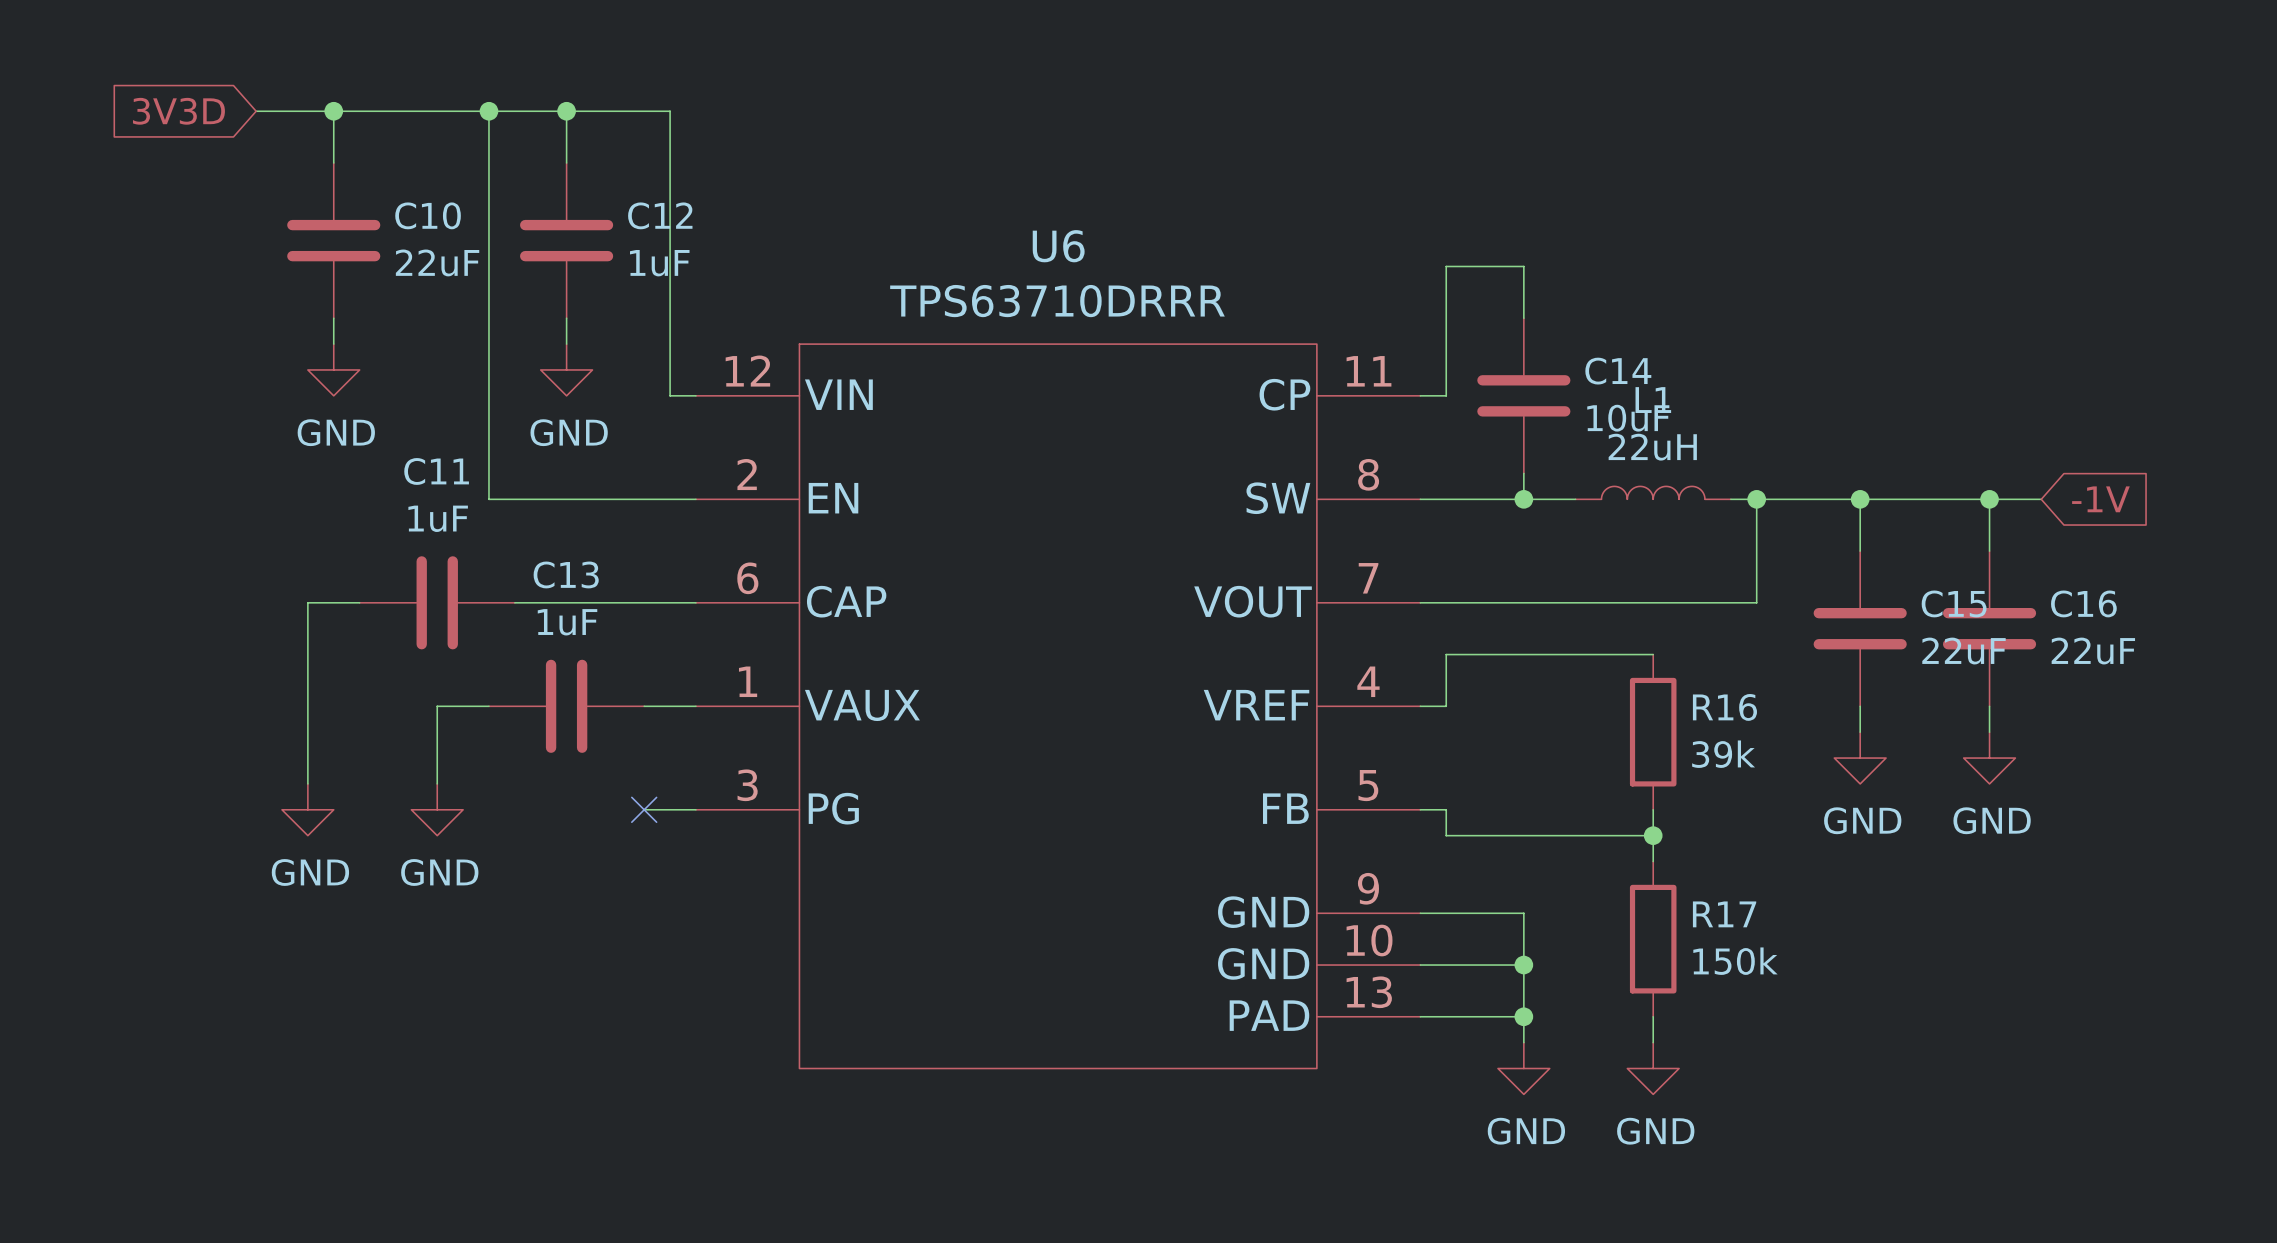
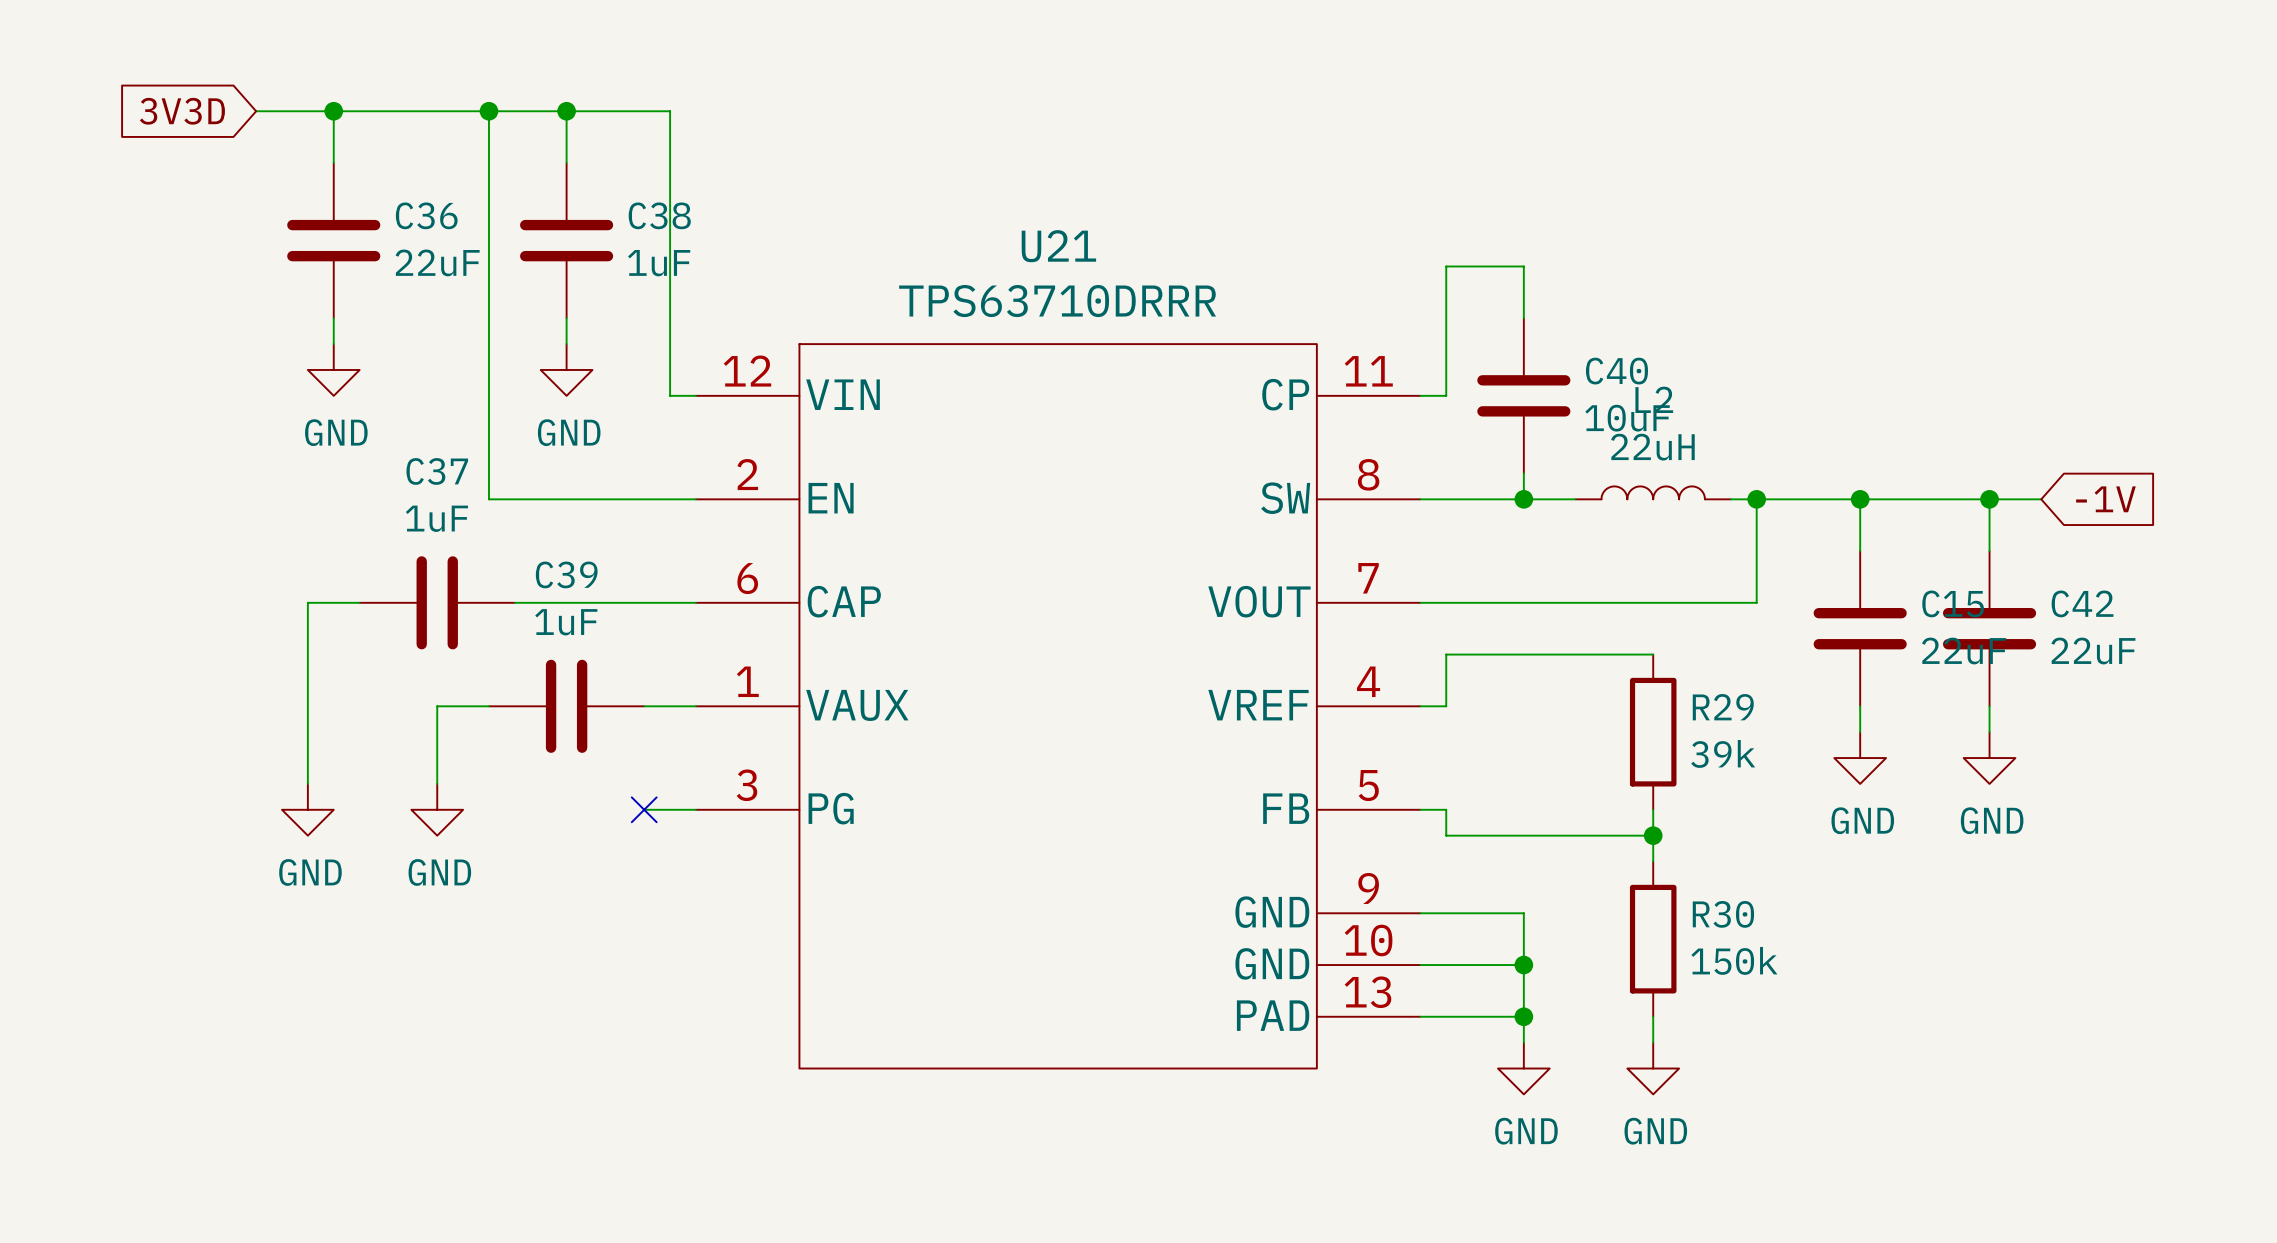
C10 name: C10 (428, 215) -> C36 (426, 215)
C12 name: C12 (660, 215) -> C38 (659, 215)
U6 name: U6 (1058, 246) -> U21 (1058, 246)
C14 name: C14 (1618, 371) -> C40 (1616, 371)
L1 name: L1 (1653, 400) -> L2 (1654, 399)
C11 name: C11 (436, 471) -> C37 (437, 471)
C13 name: C13 (566, 574) -> C39 (566, 574)
C16 name: C16 (2083, 603) -> C42 (2082, 603)
R16 name: R16 (1724, 707) -> R29 (1723, 707)
R17 name: R17 (1724, 914) -> R30 (1723, 914)

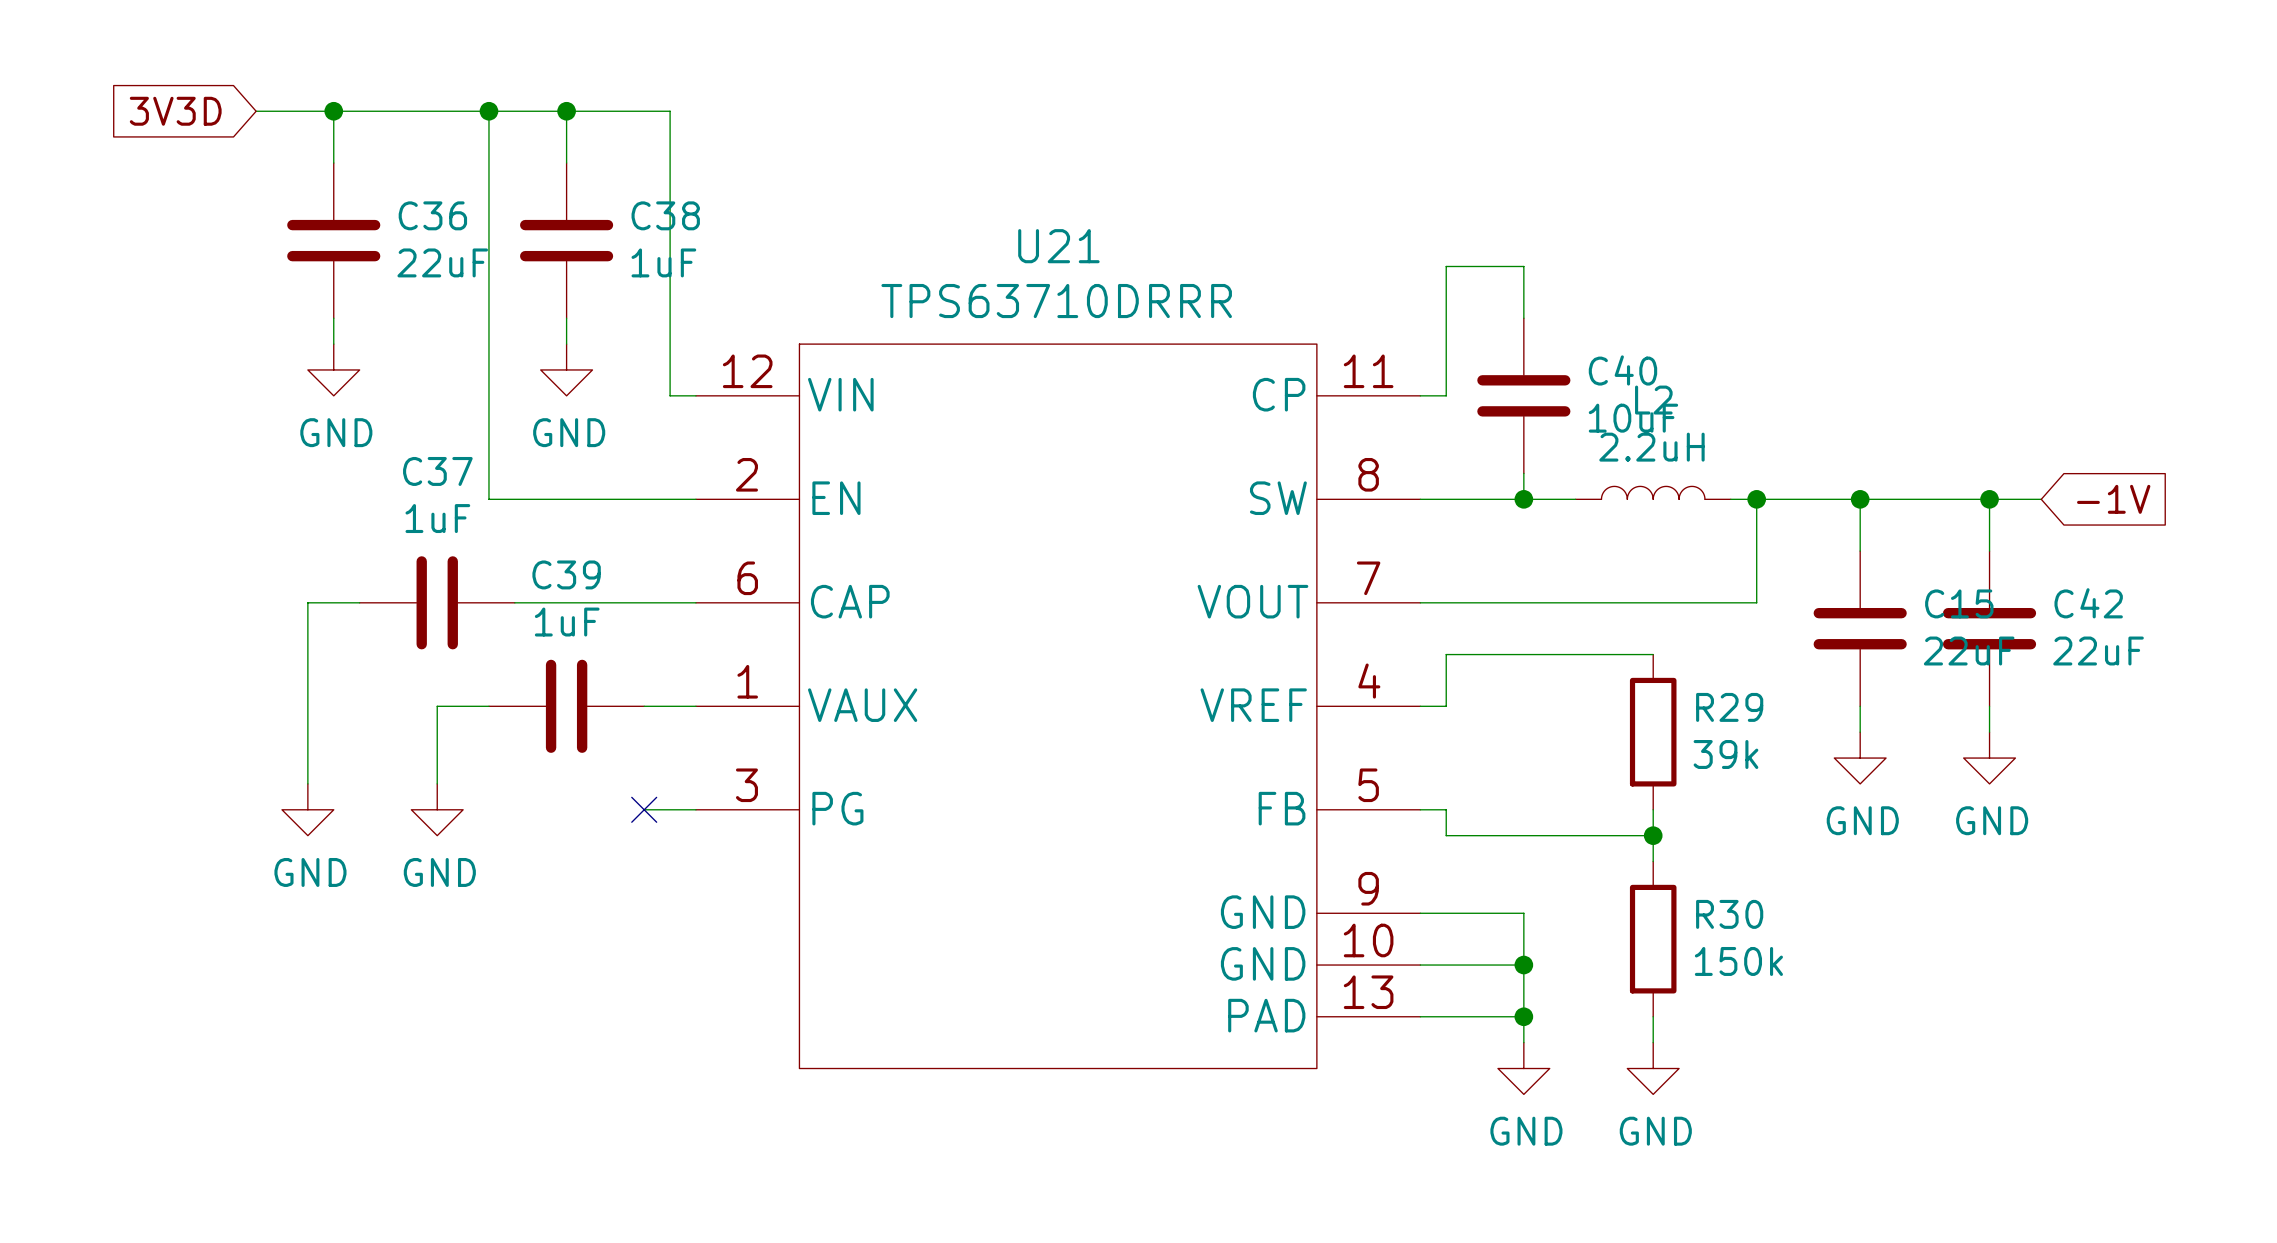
L2 value: 22uH (1652, 447) -> 2.2uH (1651, 447)

